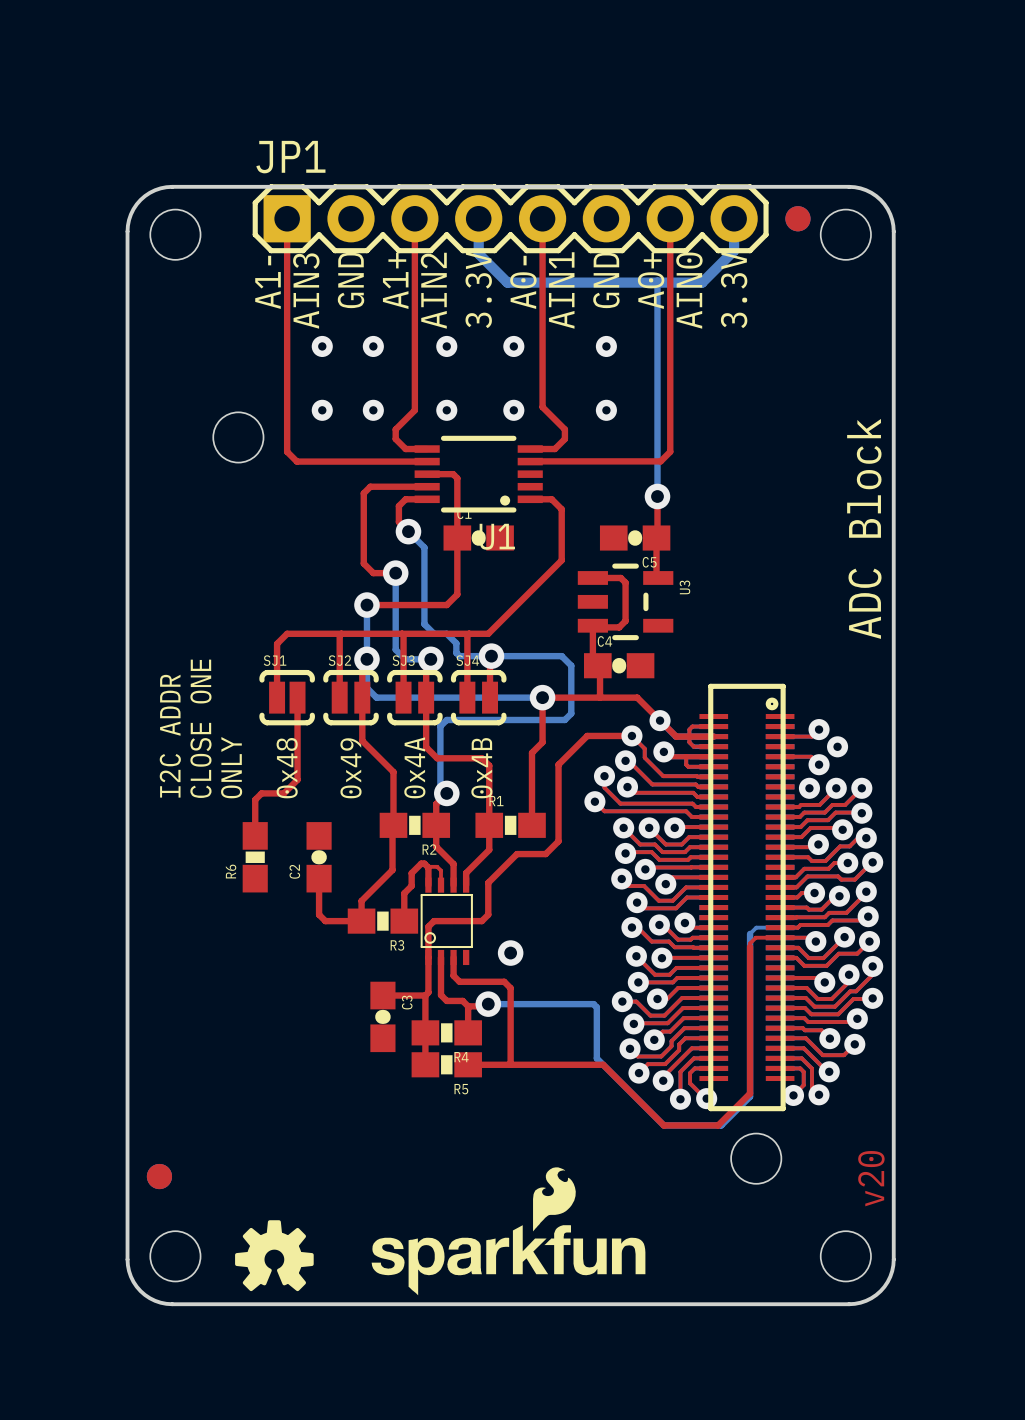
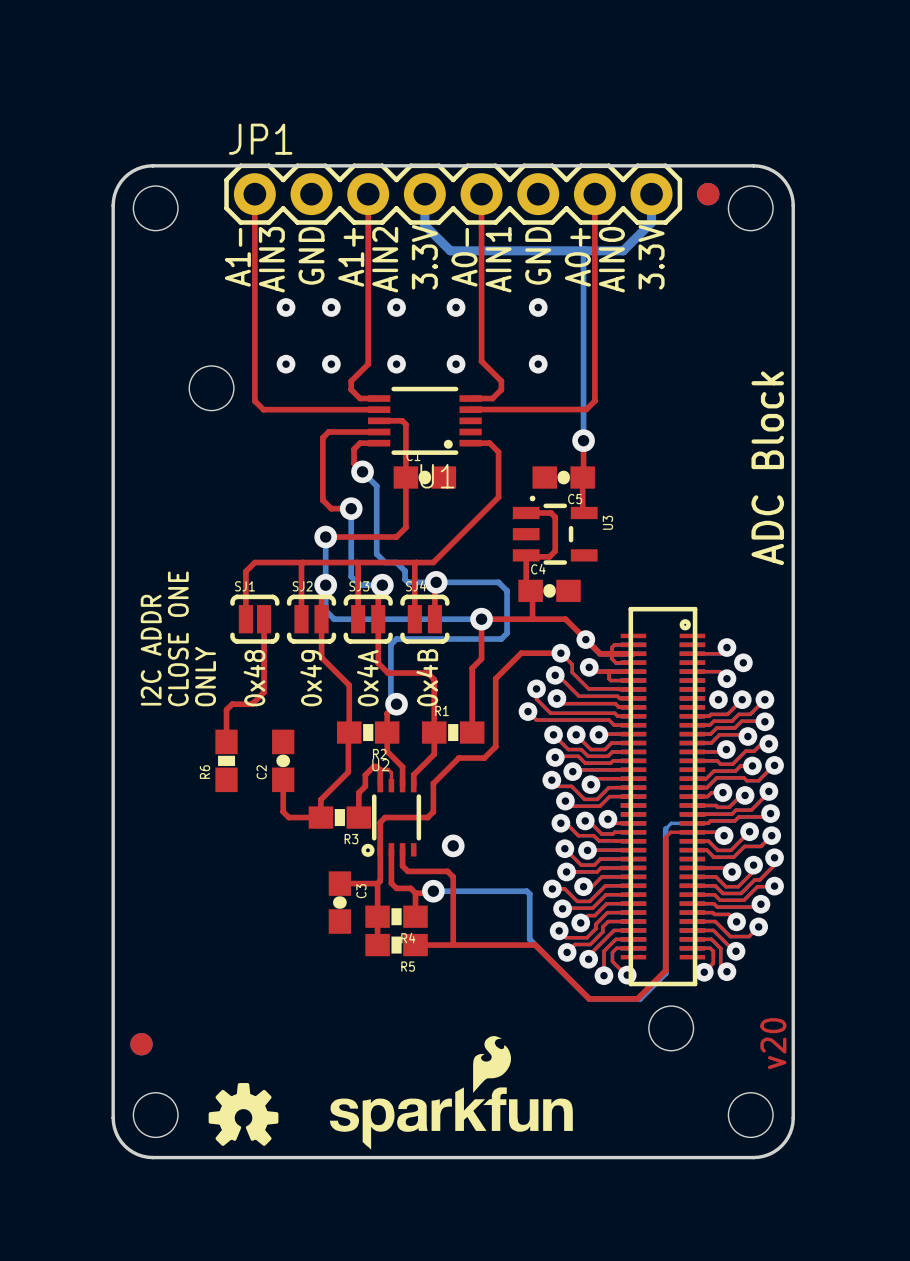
JP1 footprint: [252, 184, 769, 254] -> [224, 163, 683, 225]
U3 footprint: [577, 563, 674, 641] -> [512, 495, 598, 565]
U2: none -> (391, 817)
part: (446, 921) -> none

